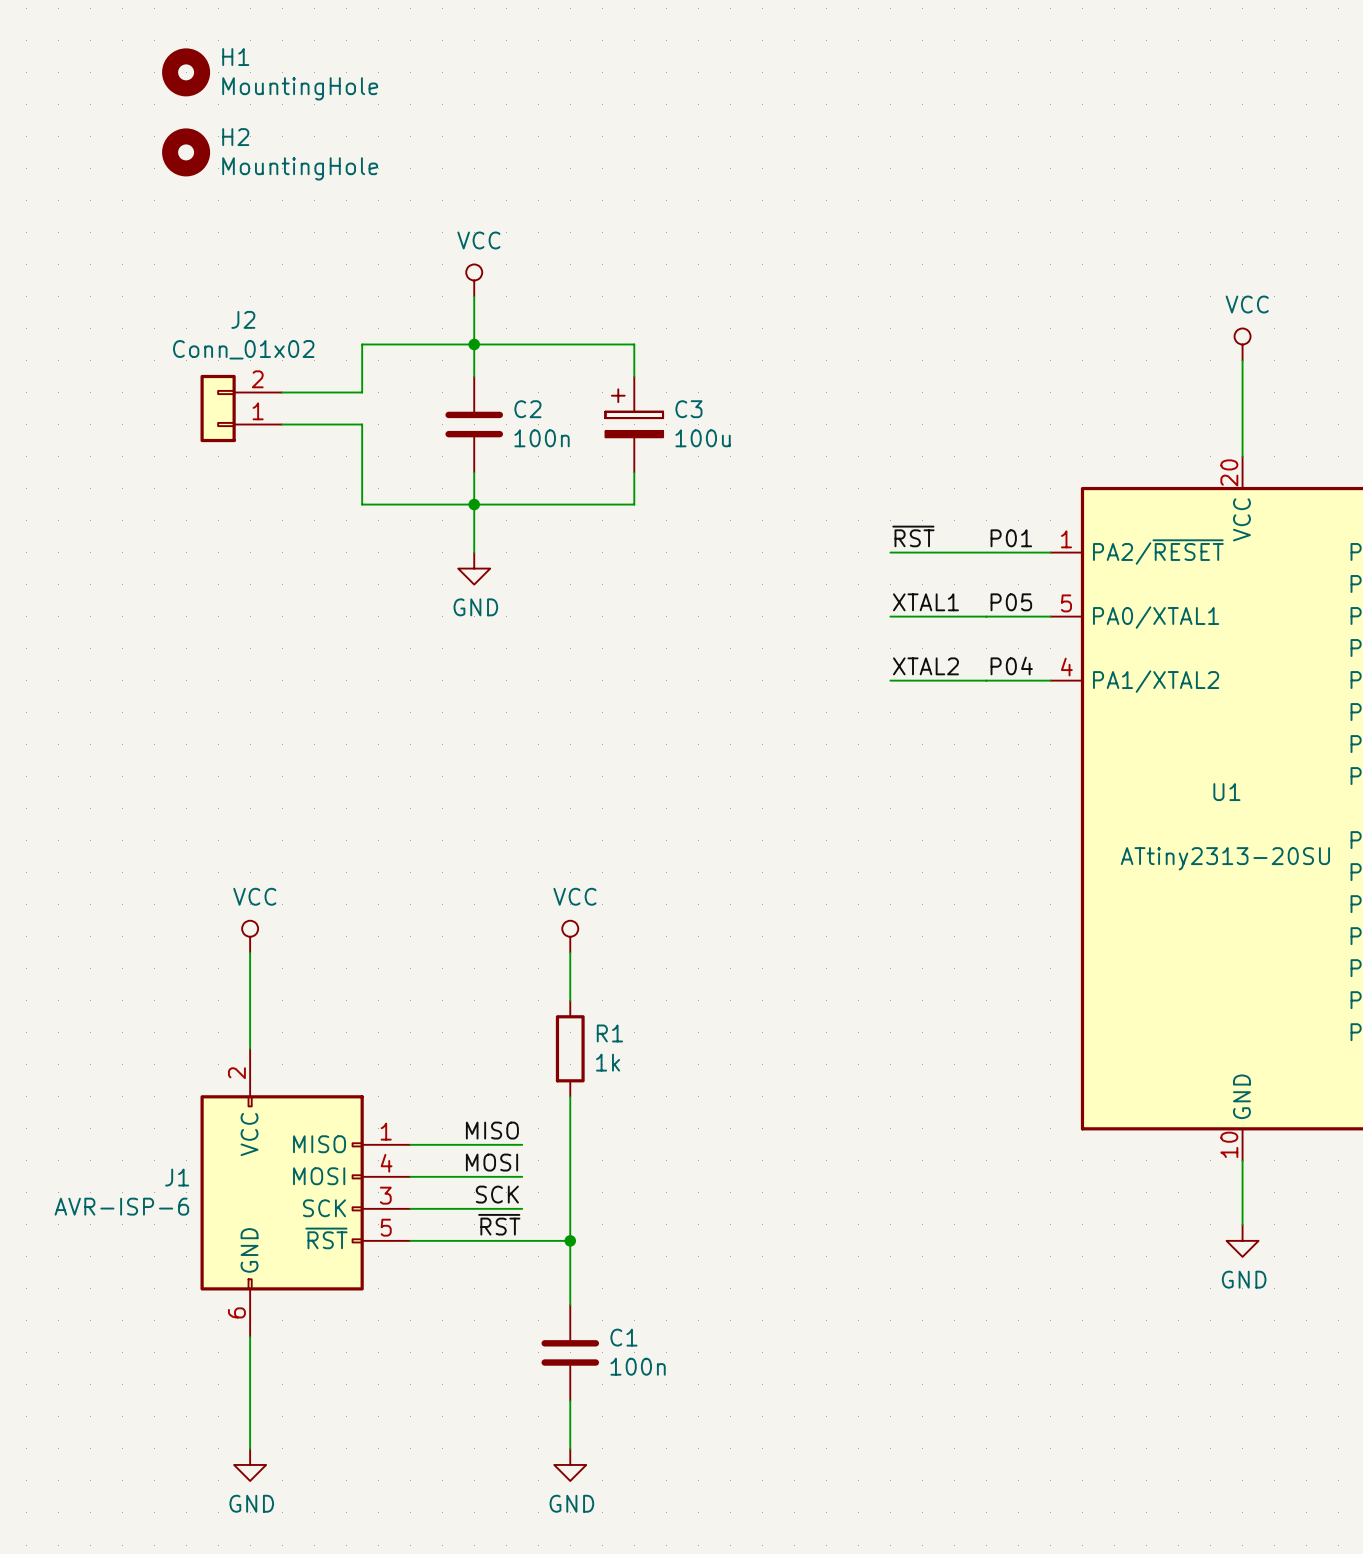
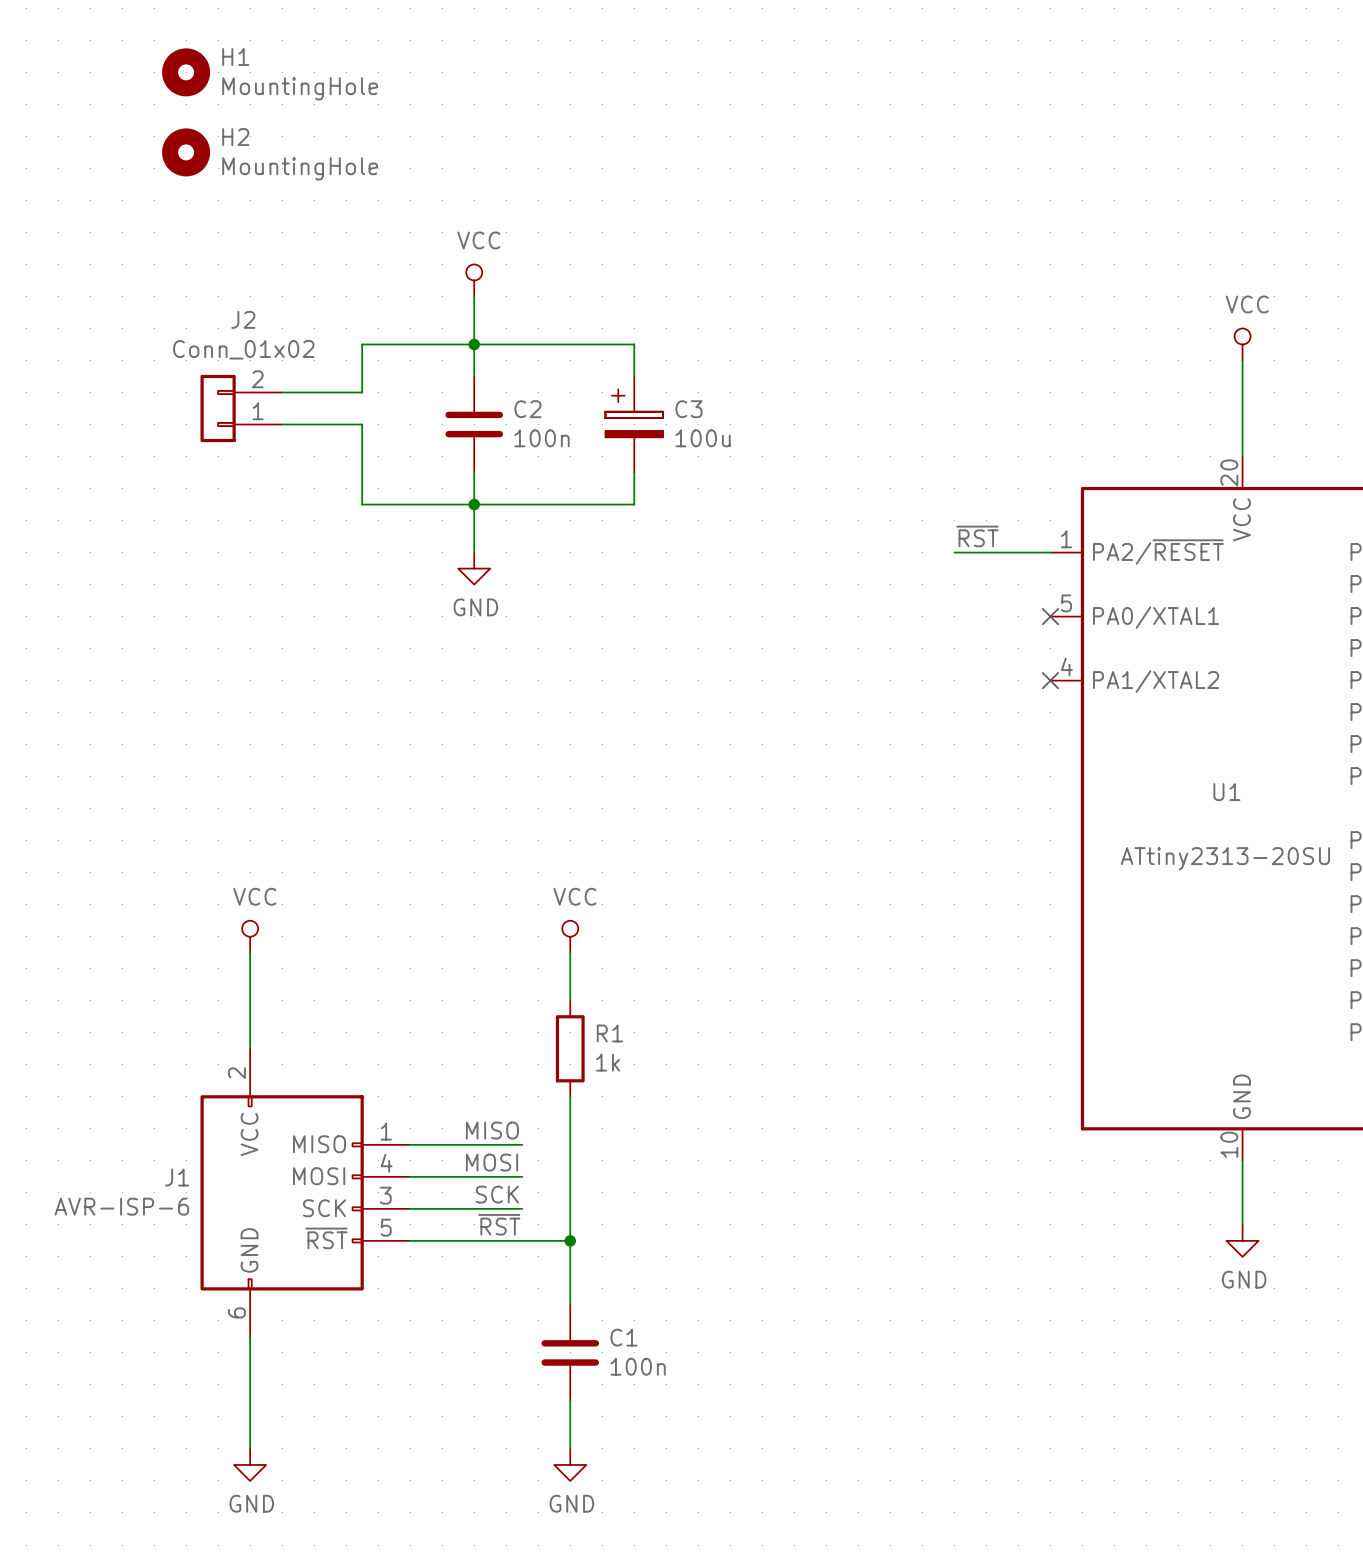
label position: ~{RST} (913, 536) -> ~{RST} (977, 536)
label: P01 (1011, 538) -> none
wire: (890, 552) (954, 552) -> none
label: XTAL1 (925, 602) -> none
label: P05 (1011, 602) -> none
wire: (890, 616) (1050, 616) -> none
no-connect mark: none -> (1050, 616)
label: P04 (1011, 665) -> none
label: XTAL2 (925, 666) -> none
wire: (890, 680) (1050, 680) -> none
no-connect mark: none -> (1050, 680)

